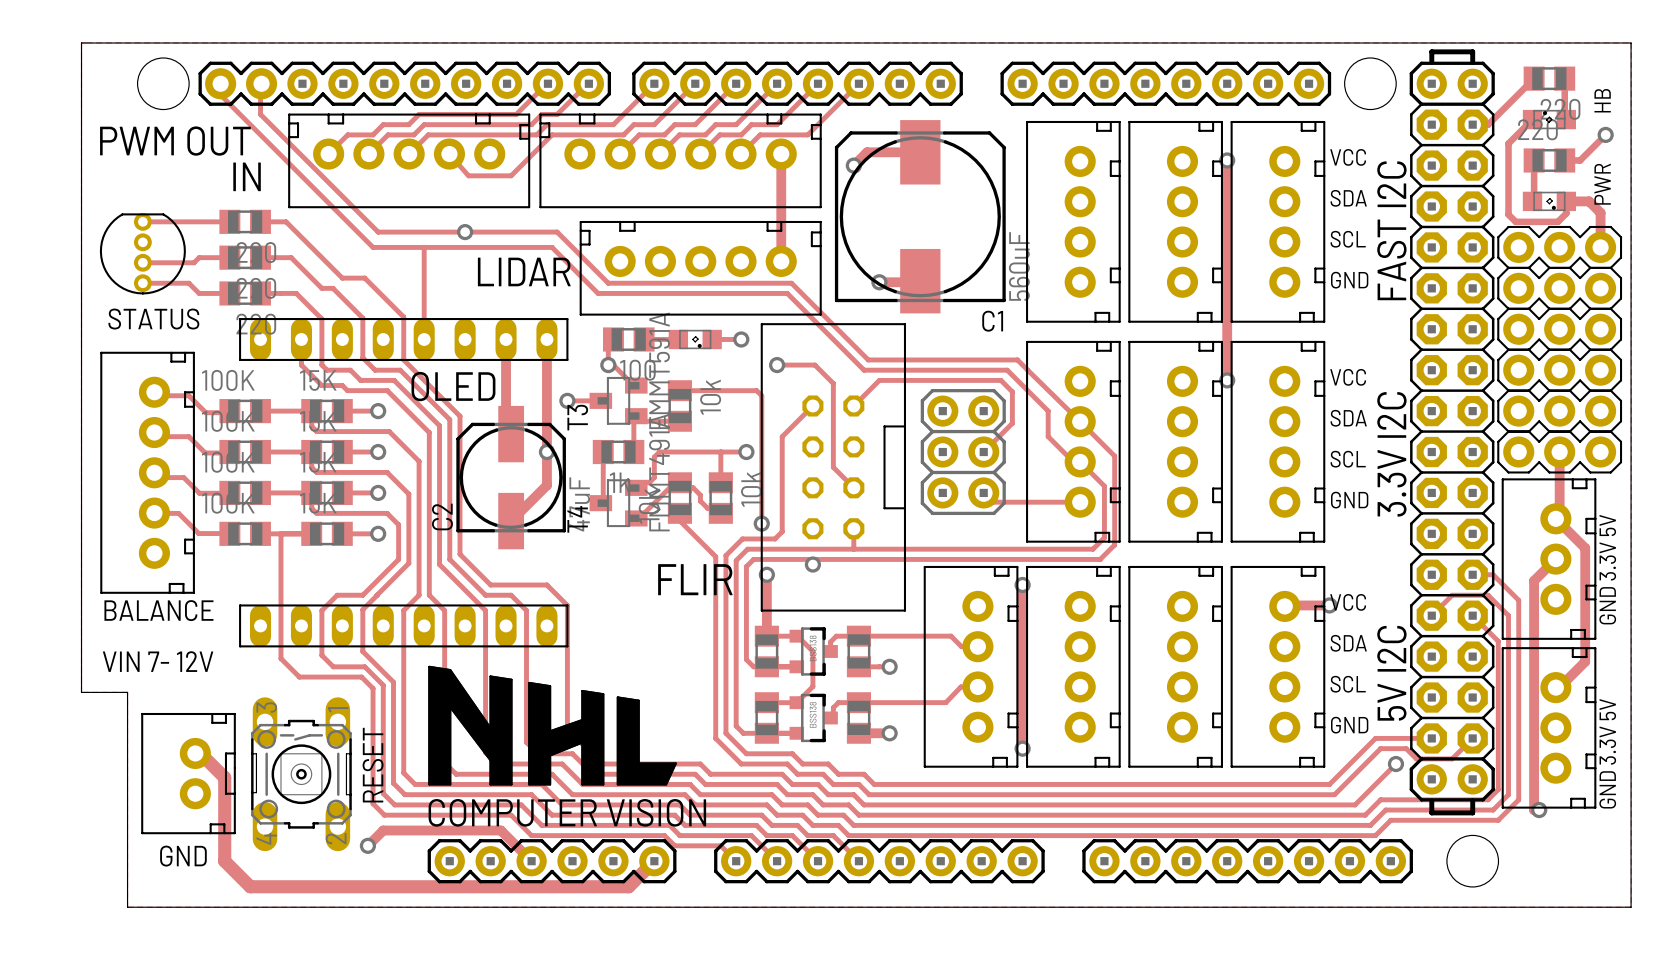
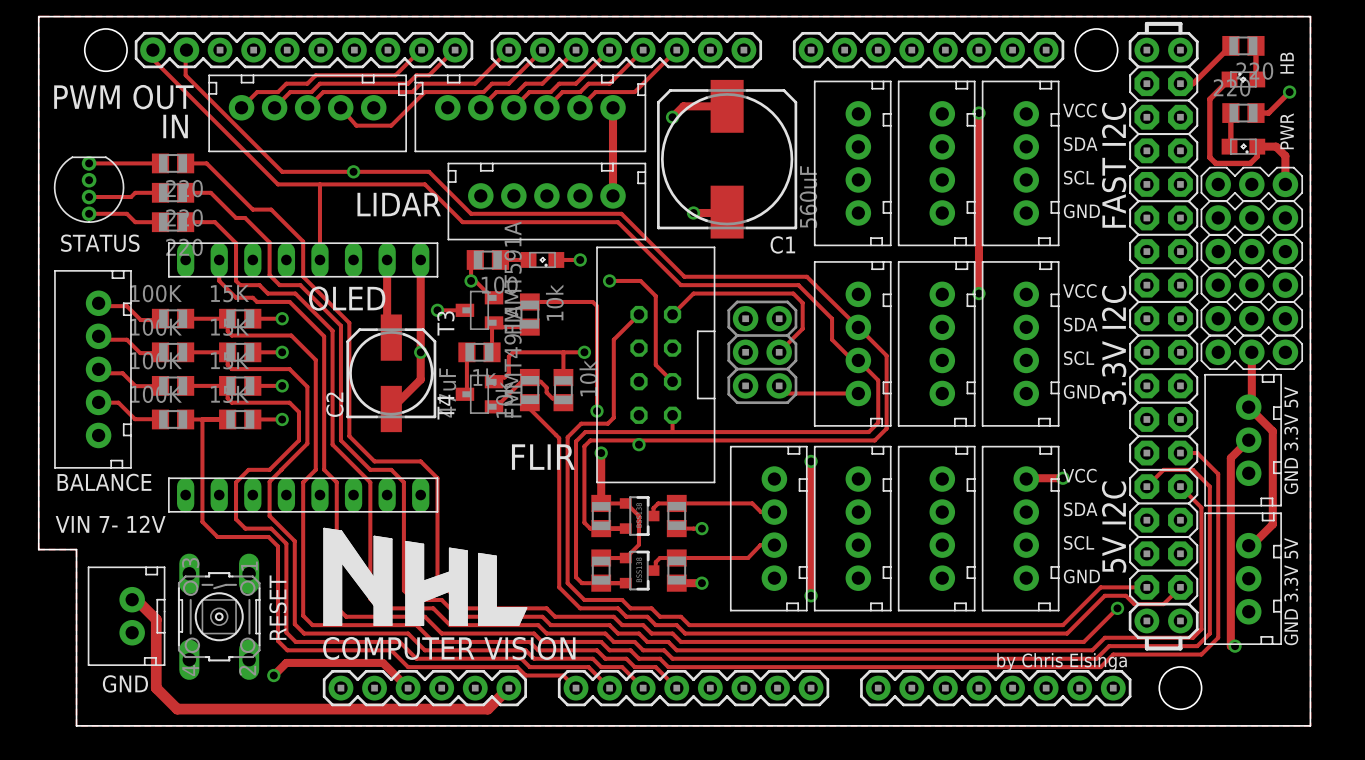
text: none -> by Chris Elsinga (1062, 662)

